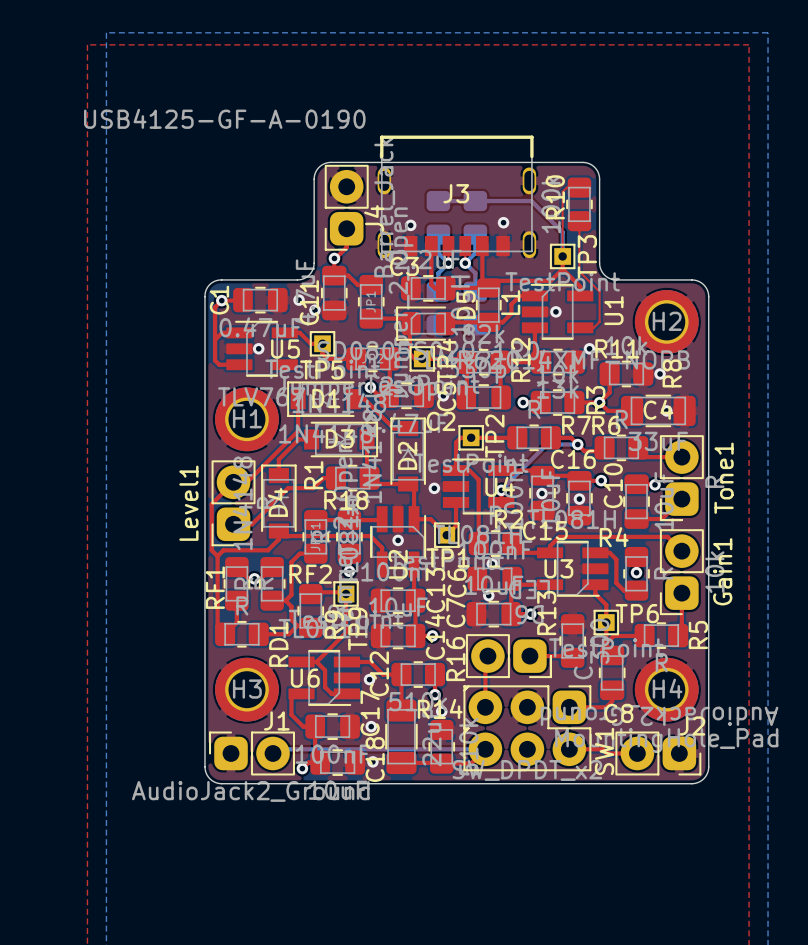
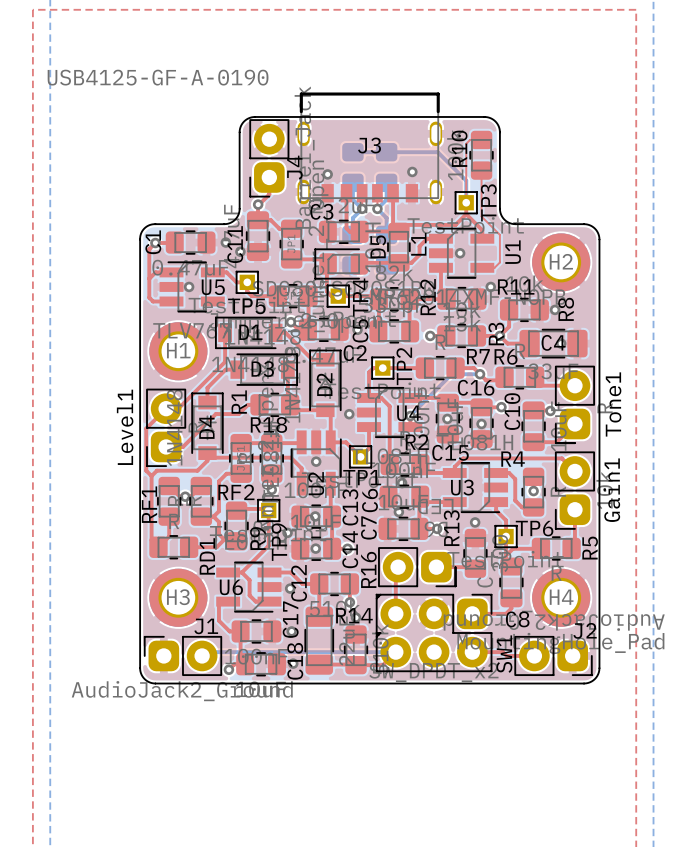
via: none -> (315, 516)
via: none -> (475, 522)
via: none -> (287, 532)
via: none -> (315, 548)

